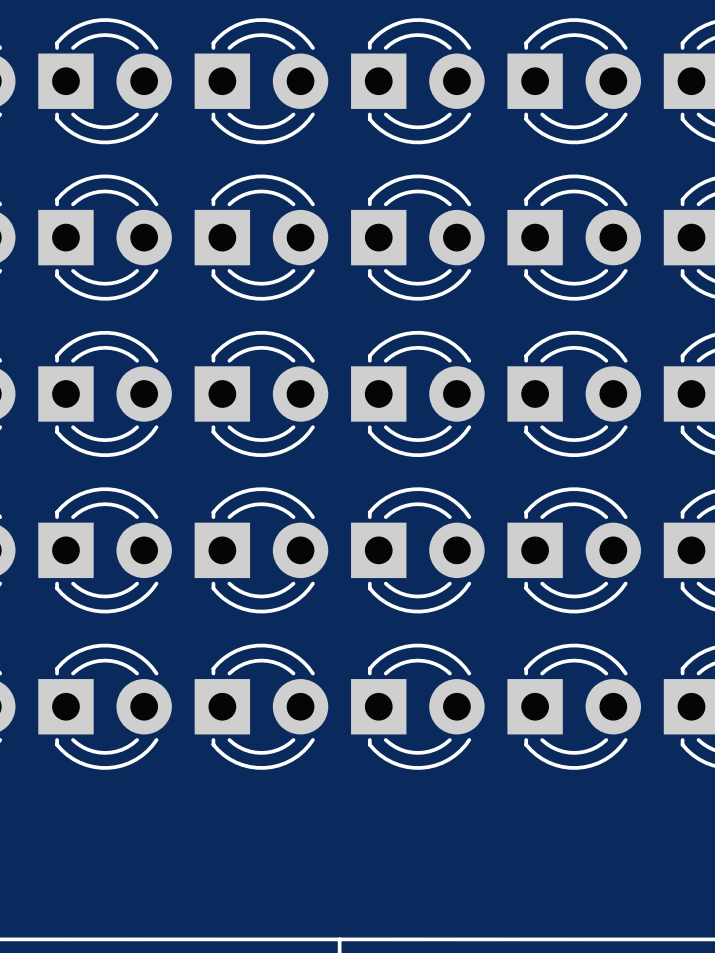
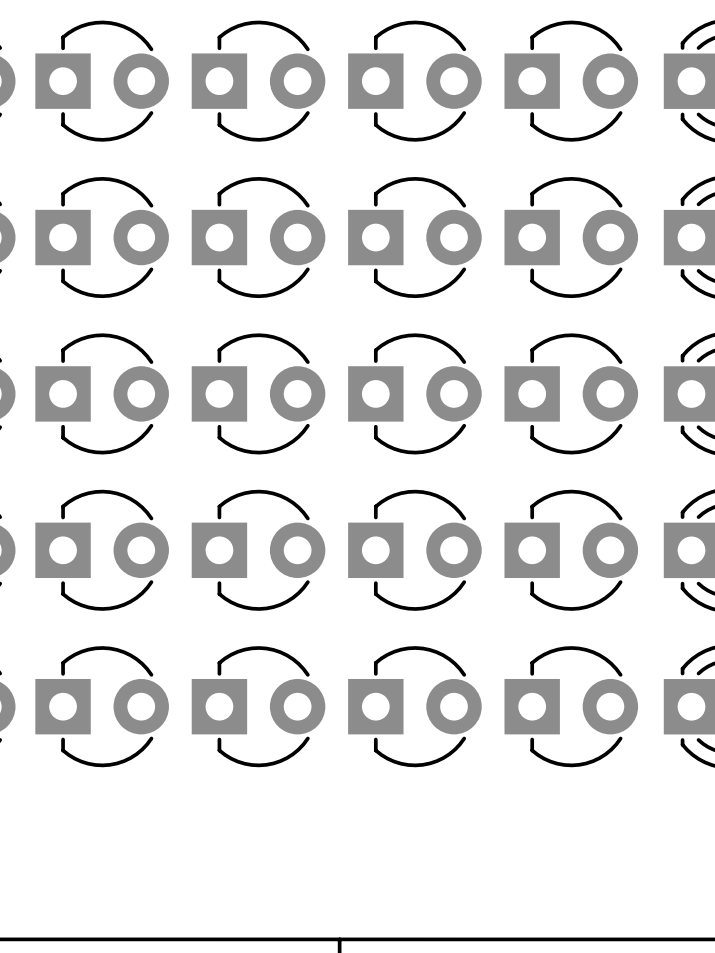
part footprint: [38, 18, 172, 145] -> [35, 20, 169, 142]
part footprint: [194, 18, 329, 145] -> [191, 20, 326, 142]
part footprint: [351, 18, 485, 145] -> [348, 20, 482, 142]
part footprint: [507, 18, 642, 145] -> [504, 20, 639, 142]
part footprint: [38, 174, 172, 301] -> [35, 177, 169, 299]
part footprint: [194, 174, 329, 301] -> [191, 177, 326, 299]
part footprint: [351, 174, 485, 301] -> [348, 177, 482, 299]
part footprint: [507, 174, 642, 301] -> [504, 177, 639, 299]
part footprint: [38, 330, 172, 458] -> [35, 333, 169, 455]
part footprint: [194, 330, 329, 458] -> [191, 333, 326, 455]
part footprint: [351, 330, 485, 458] -> [348, 333, 482, 455]
part footprint: [507, 330, 642, 458] -> [504, 333, 639, 455]
part footprint: [38, 487, 172, 614] -> [35, 489, 169, 611]
part footprint: [194, 487, 329, 614] -> [191, 489, 326, 611]
part footprint: [351, 487, 485, 614] -> [348, 489, 482, 611]
part footprint: [507, 487, 642, 614] -> [504, 489, 639, 611]
part footprint: [38, 643, 172, 770] -> [35, 646, 169, 768]
part footprint: [194, 643, 329, 770] -> [191, 646, 326, 768]
part footprint: [351, 643, 485, 770] -> [348, 646, 482, 768]
part footprint: [507, 643, 642, 770] -> [504, 646, 639, 768]

